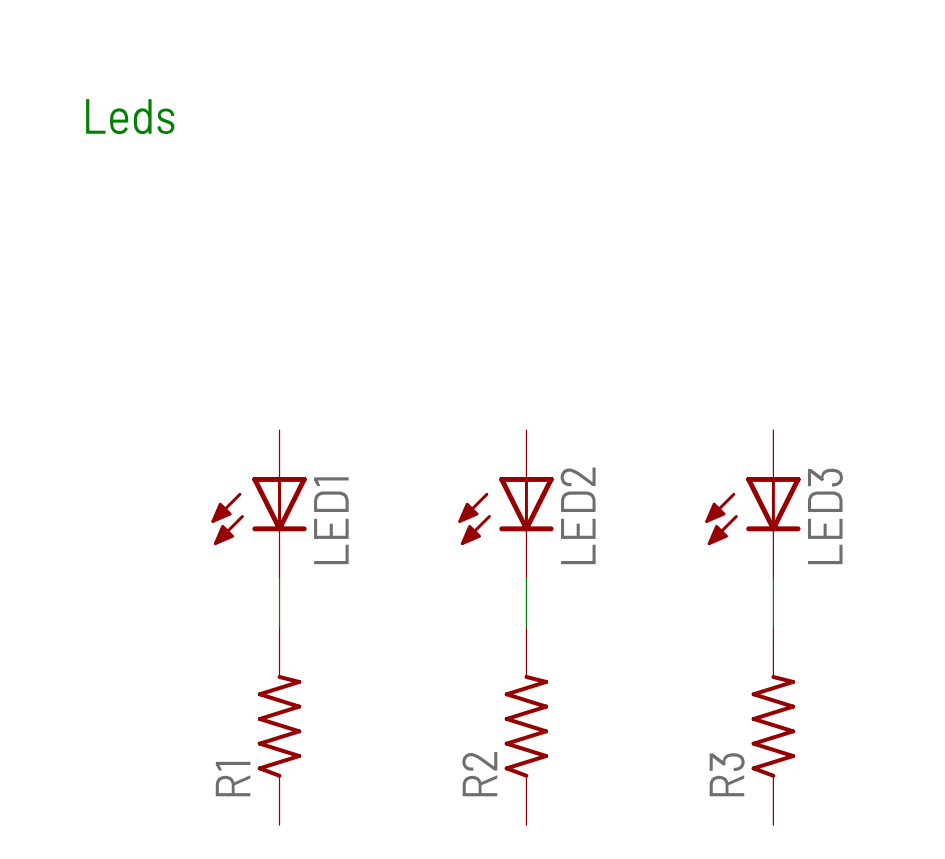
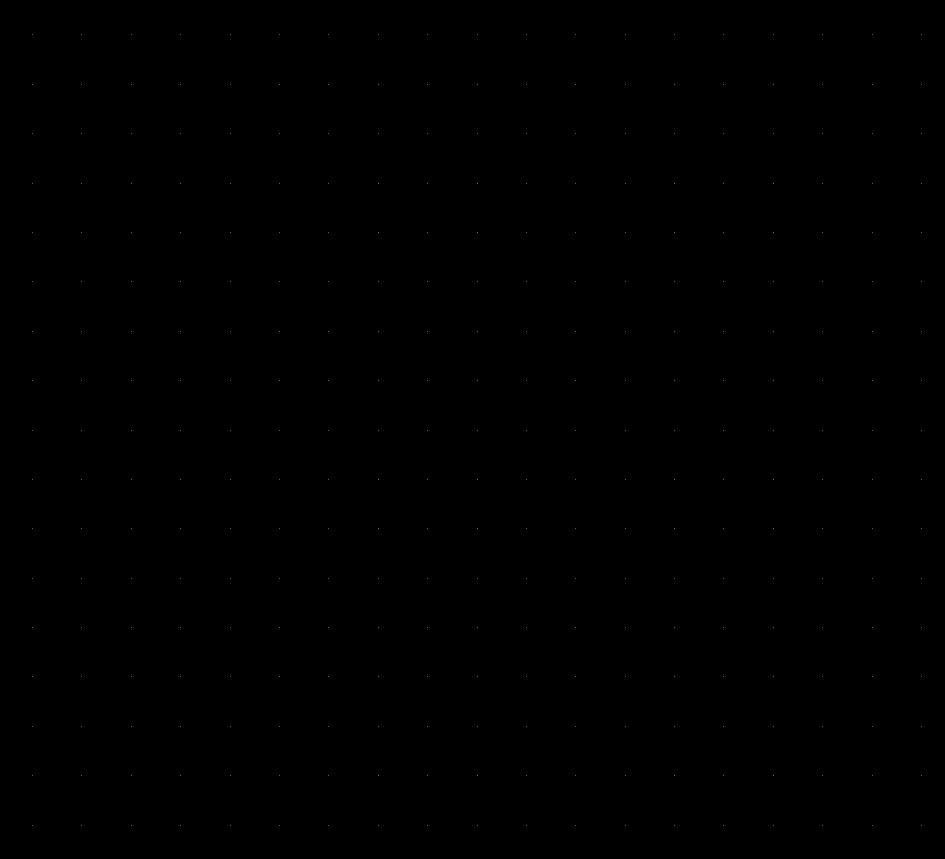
text: Leds (130, 116) -> none
LED1: (259, 504) -> none
LED2: (505, 504) -> none
LED3: (752, 504) -> none
wire: (279, 578) (279, 627) -> none
wire: (526, 578) (526, 627) -> none
wire: (773, 578) (773, 627) -> none
R1: (279, 726) -> none
R2: (526, 726) -> none
R3: (773, 726) -> none

